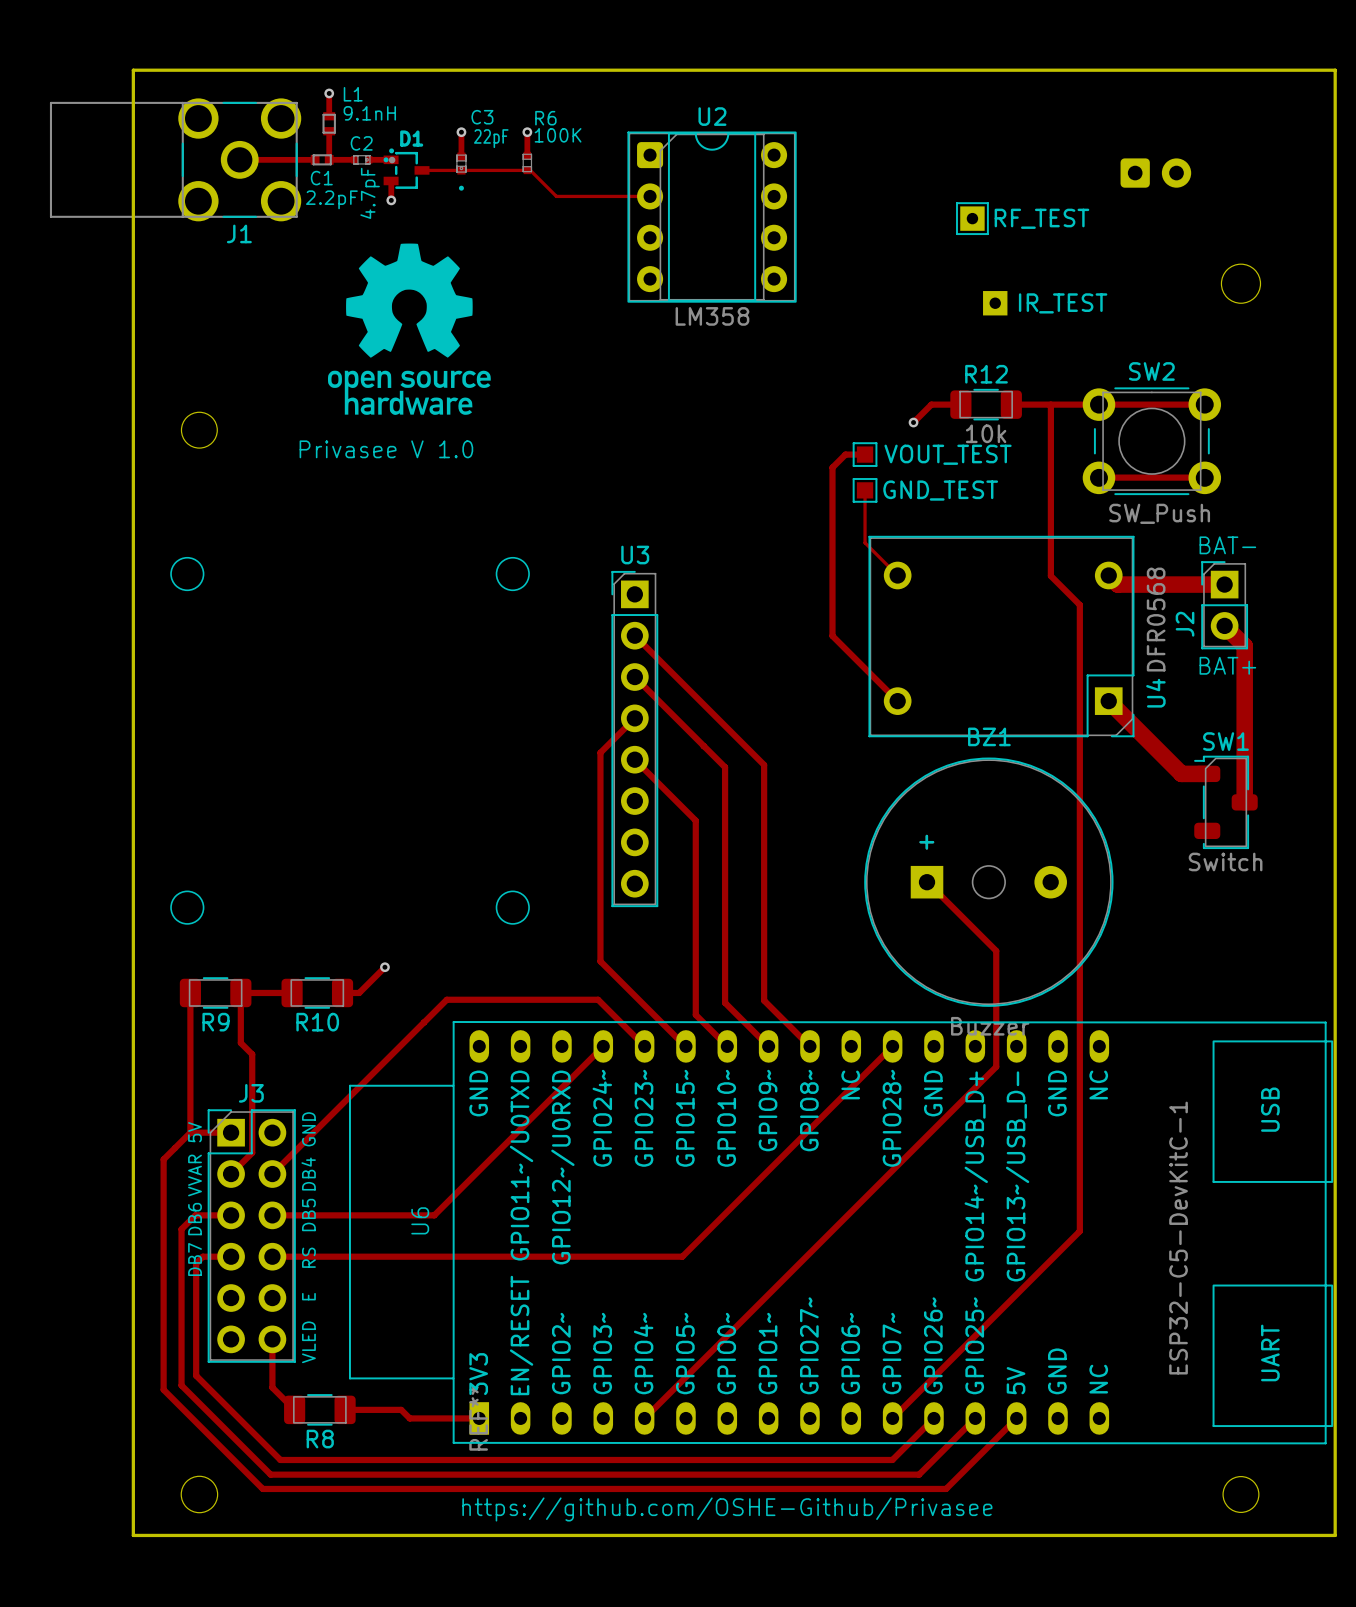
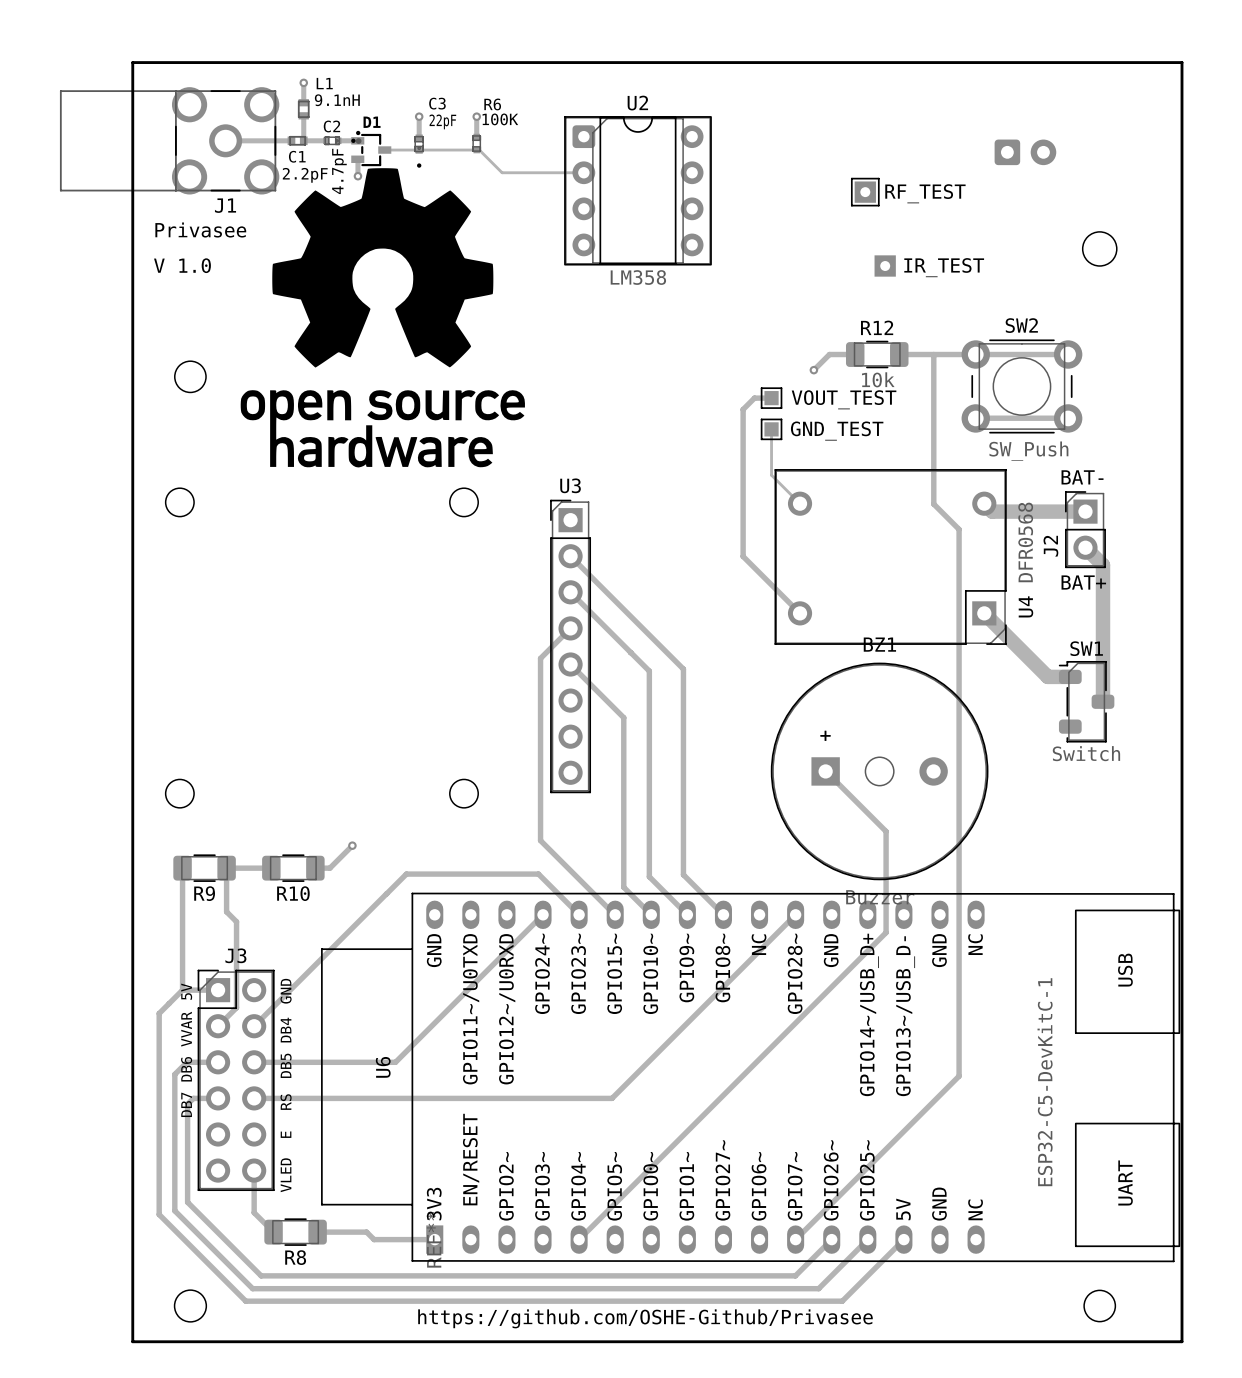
drawing: none -> [240, 168, 525, 468]
drawing: [327, 243, 491, 415] -> none
text position: Privasee (348, 449) -> Privasee (200, 230)
text position: V 1.0 (442, 449) -> V 1.0 (182, 265)

